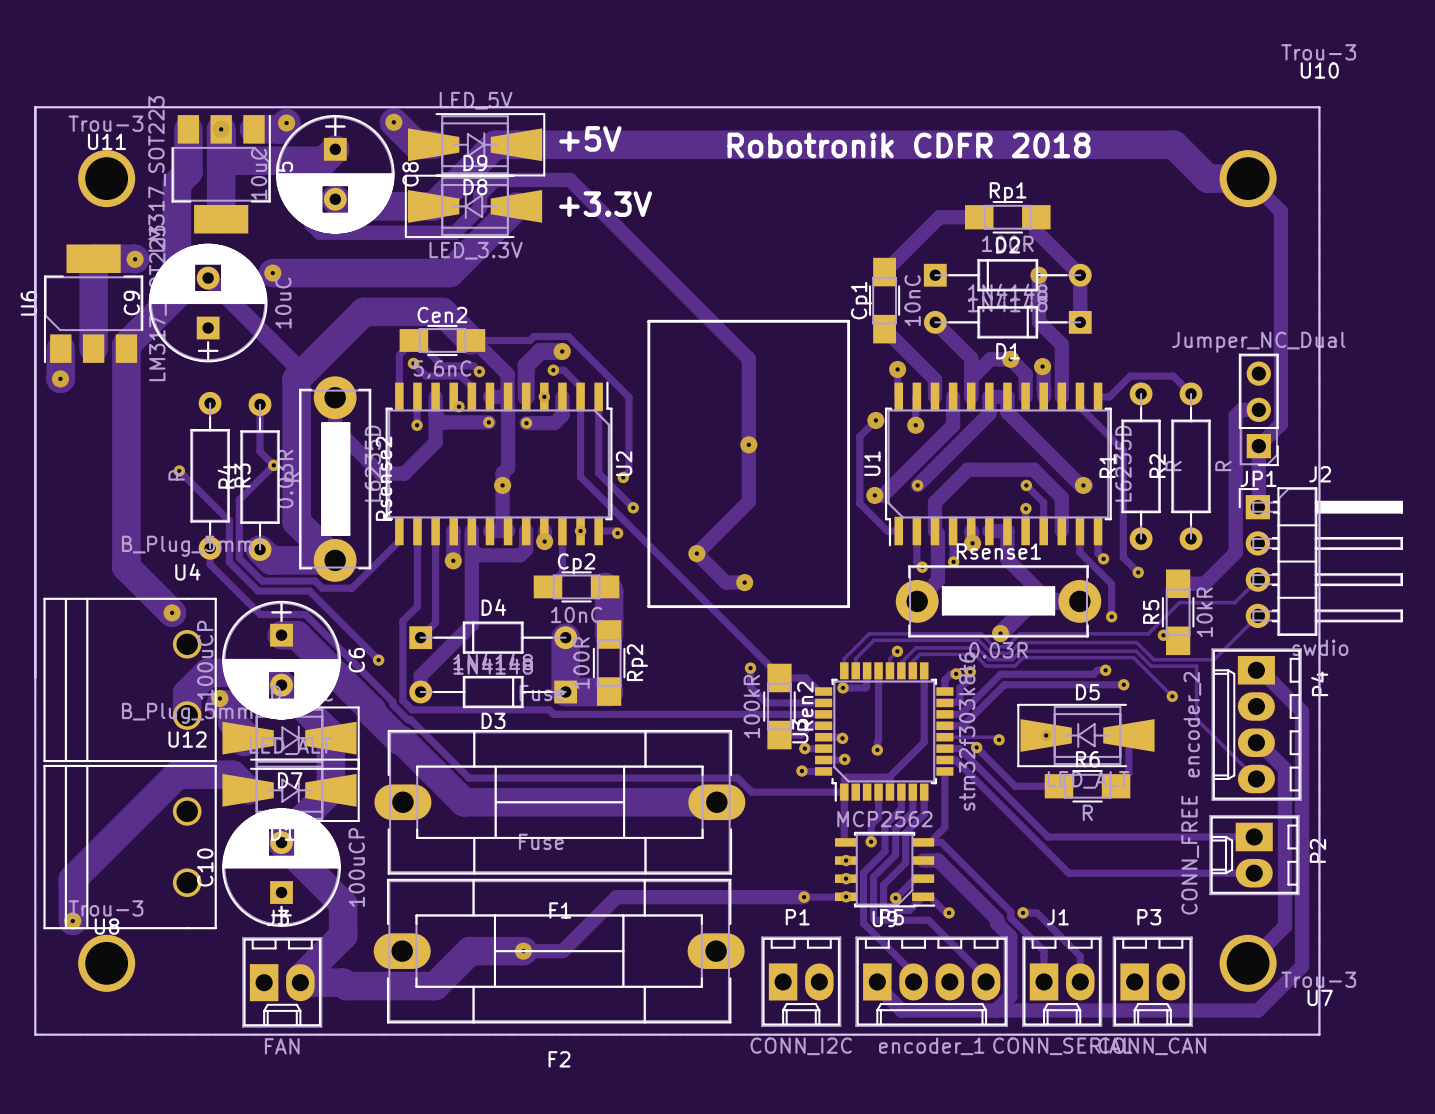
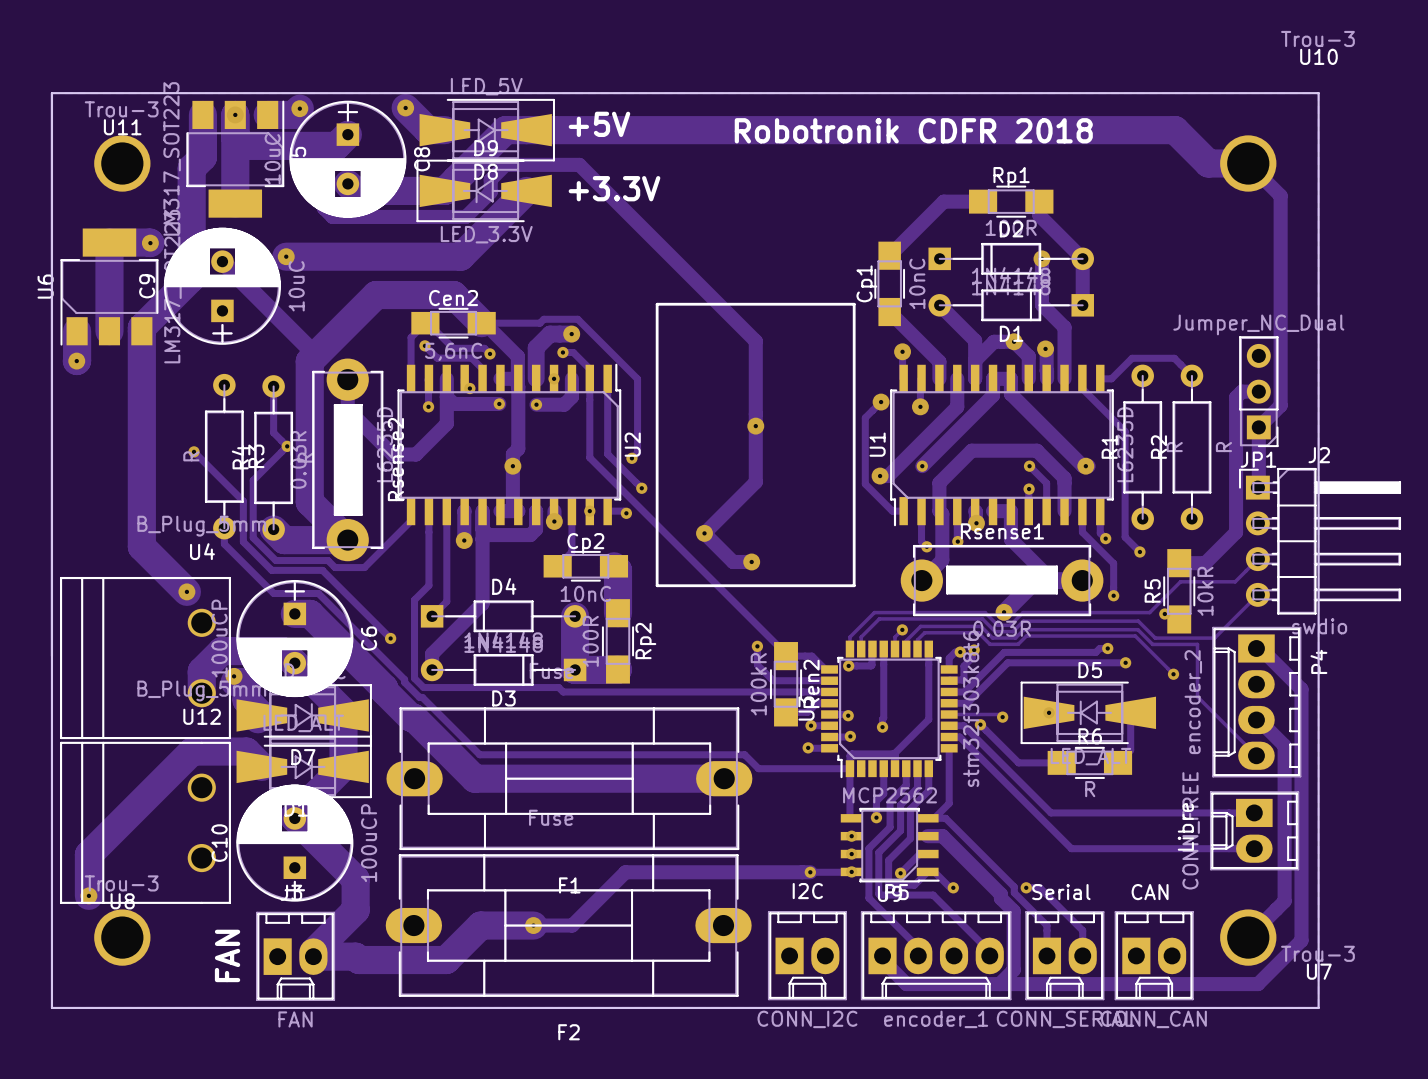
P2 name: P2 (1317, 850) -> Libre (1185, 826)
P1 name: P1 (797, 917) -> I2C (807, 891)
J1 name: J1 (1057, 917) -> Serial (1061, 892)
P3 name: P3 (1149, 917) -> CAN (1150, 892)
text: none -> FAN (227, 955)

